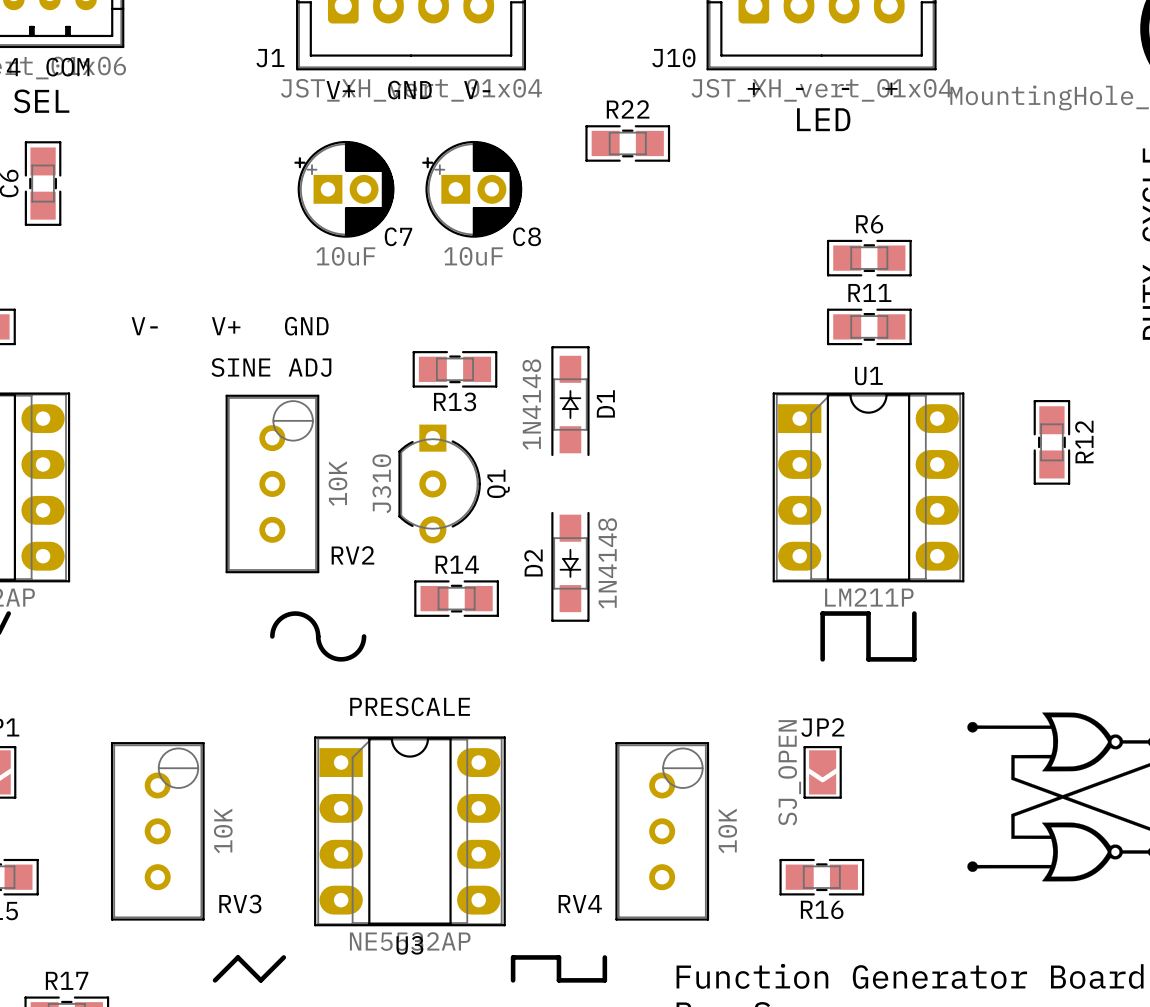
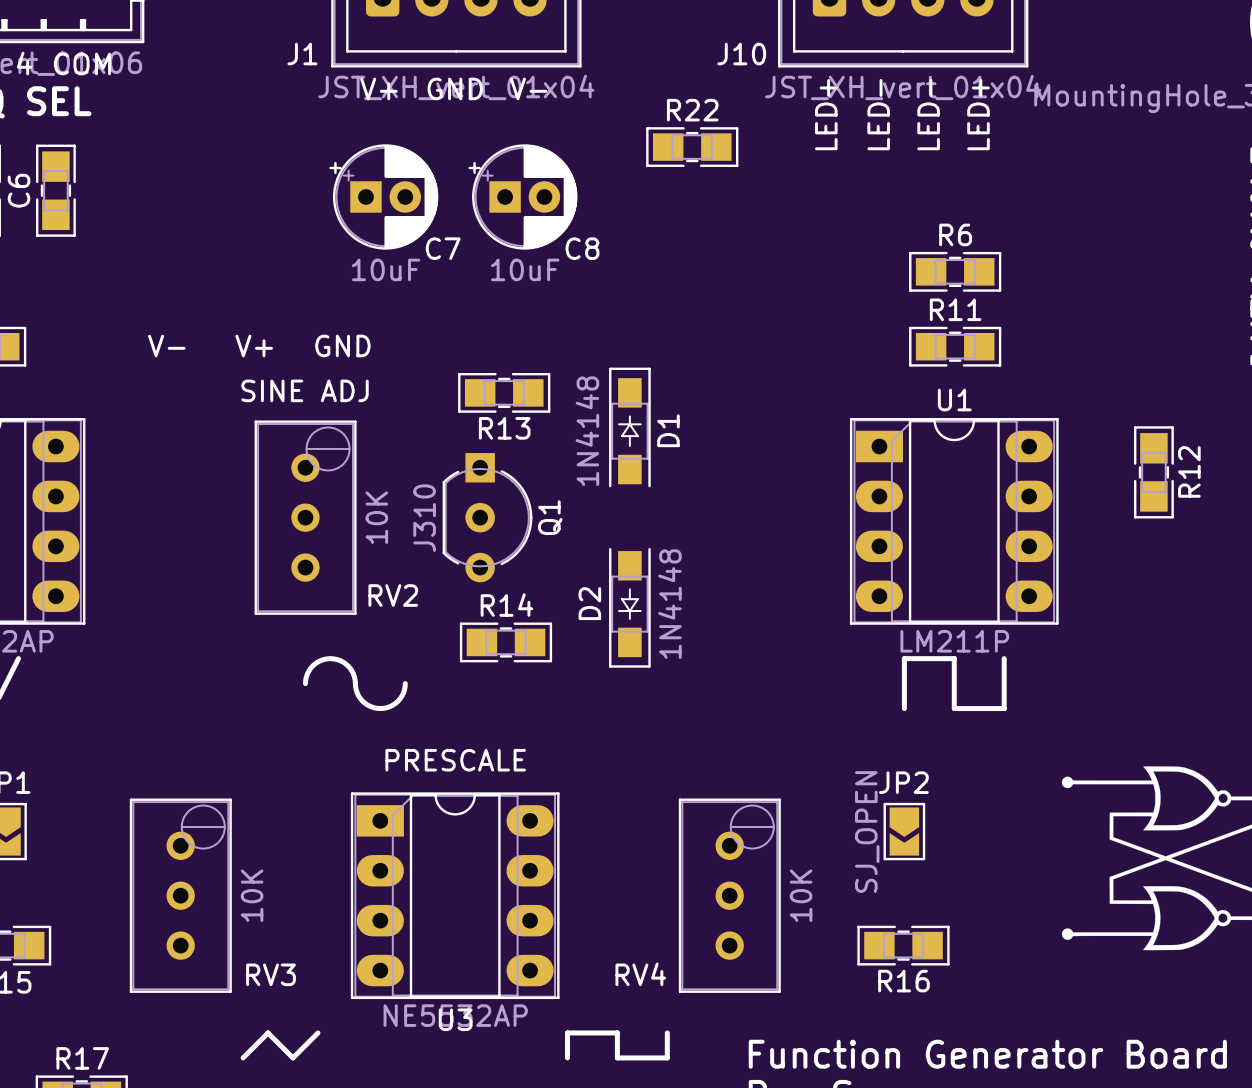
text: + (753, 88) -> none
text: - (799, 88) -> none
text: - (845, 88) -> none
text: + (891, 88) -> none
text: none -> LED+ (826, 114)
text: none -> LED+ (978, 114)
text: none -> LED- (878, 114)
text: none -> LED- (928, 114)
text: LED (823, 119) -> none

